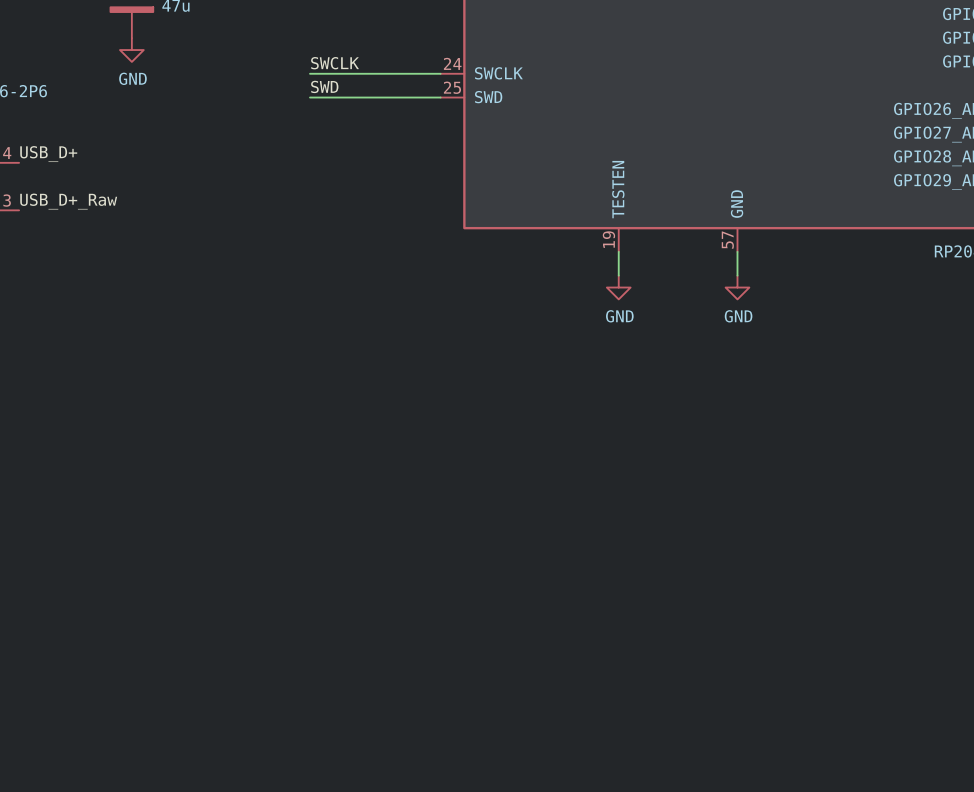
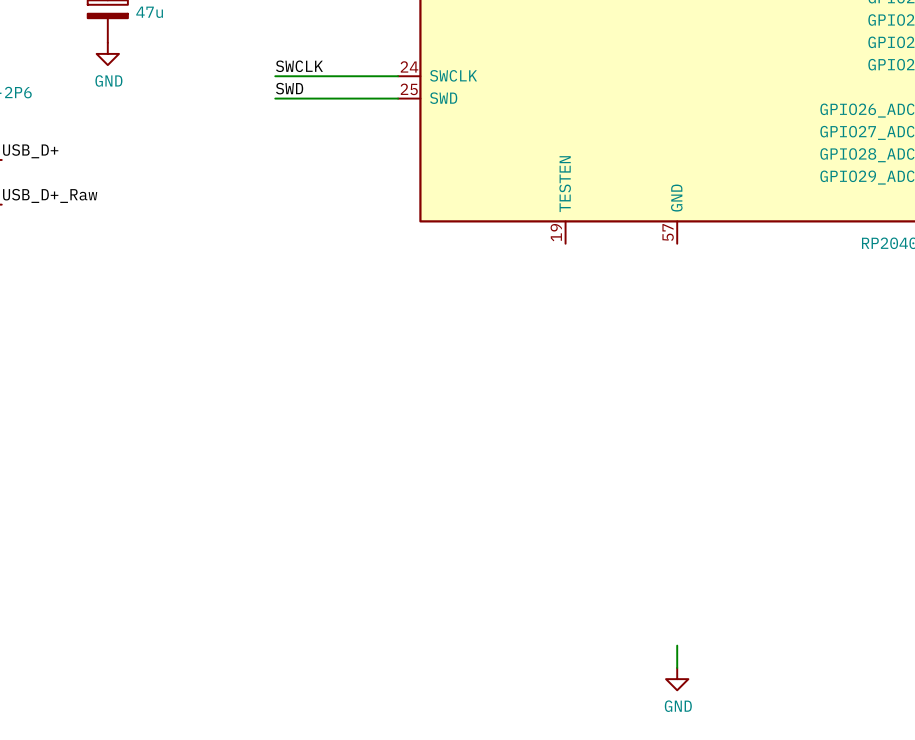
wire: (618, 251) (618, 275) -> none
wire: (737, 251) (737, 275) -> none
power symbol: GND (618, 287) -> none
power symbol: GND (737, 287) -> none
wire: none -> (677, 645) (677, 667)
power symbol: none -> GND (677, 679)

